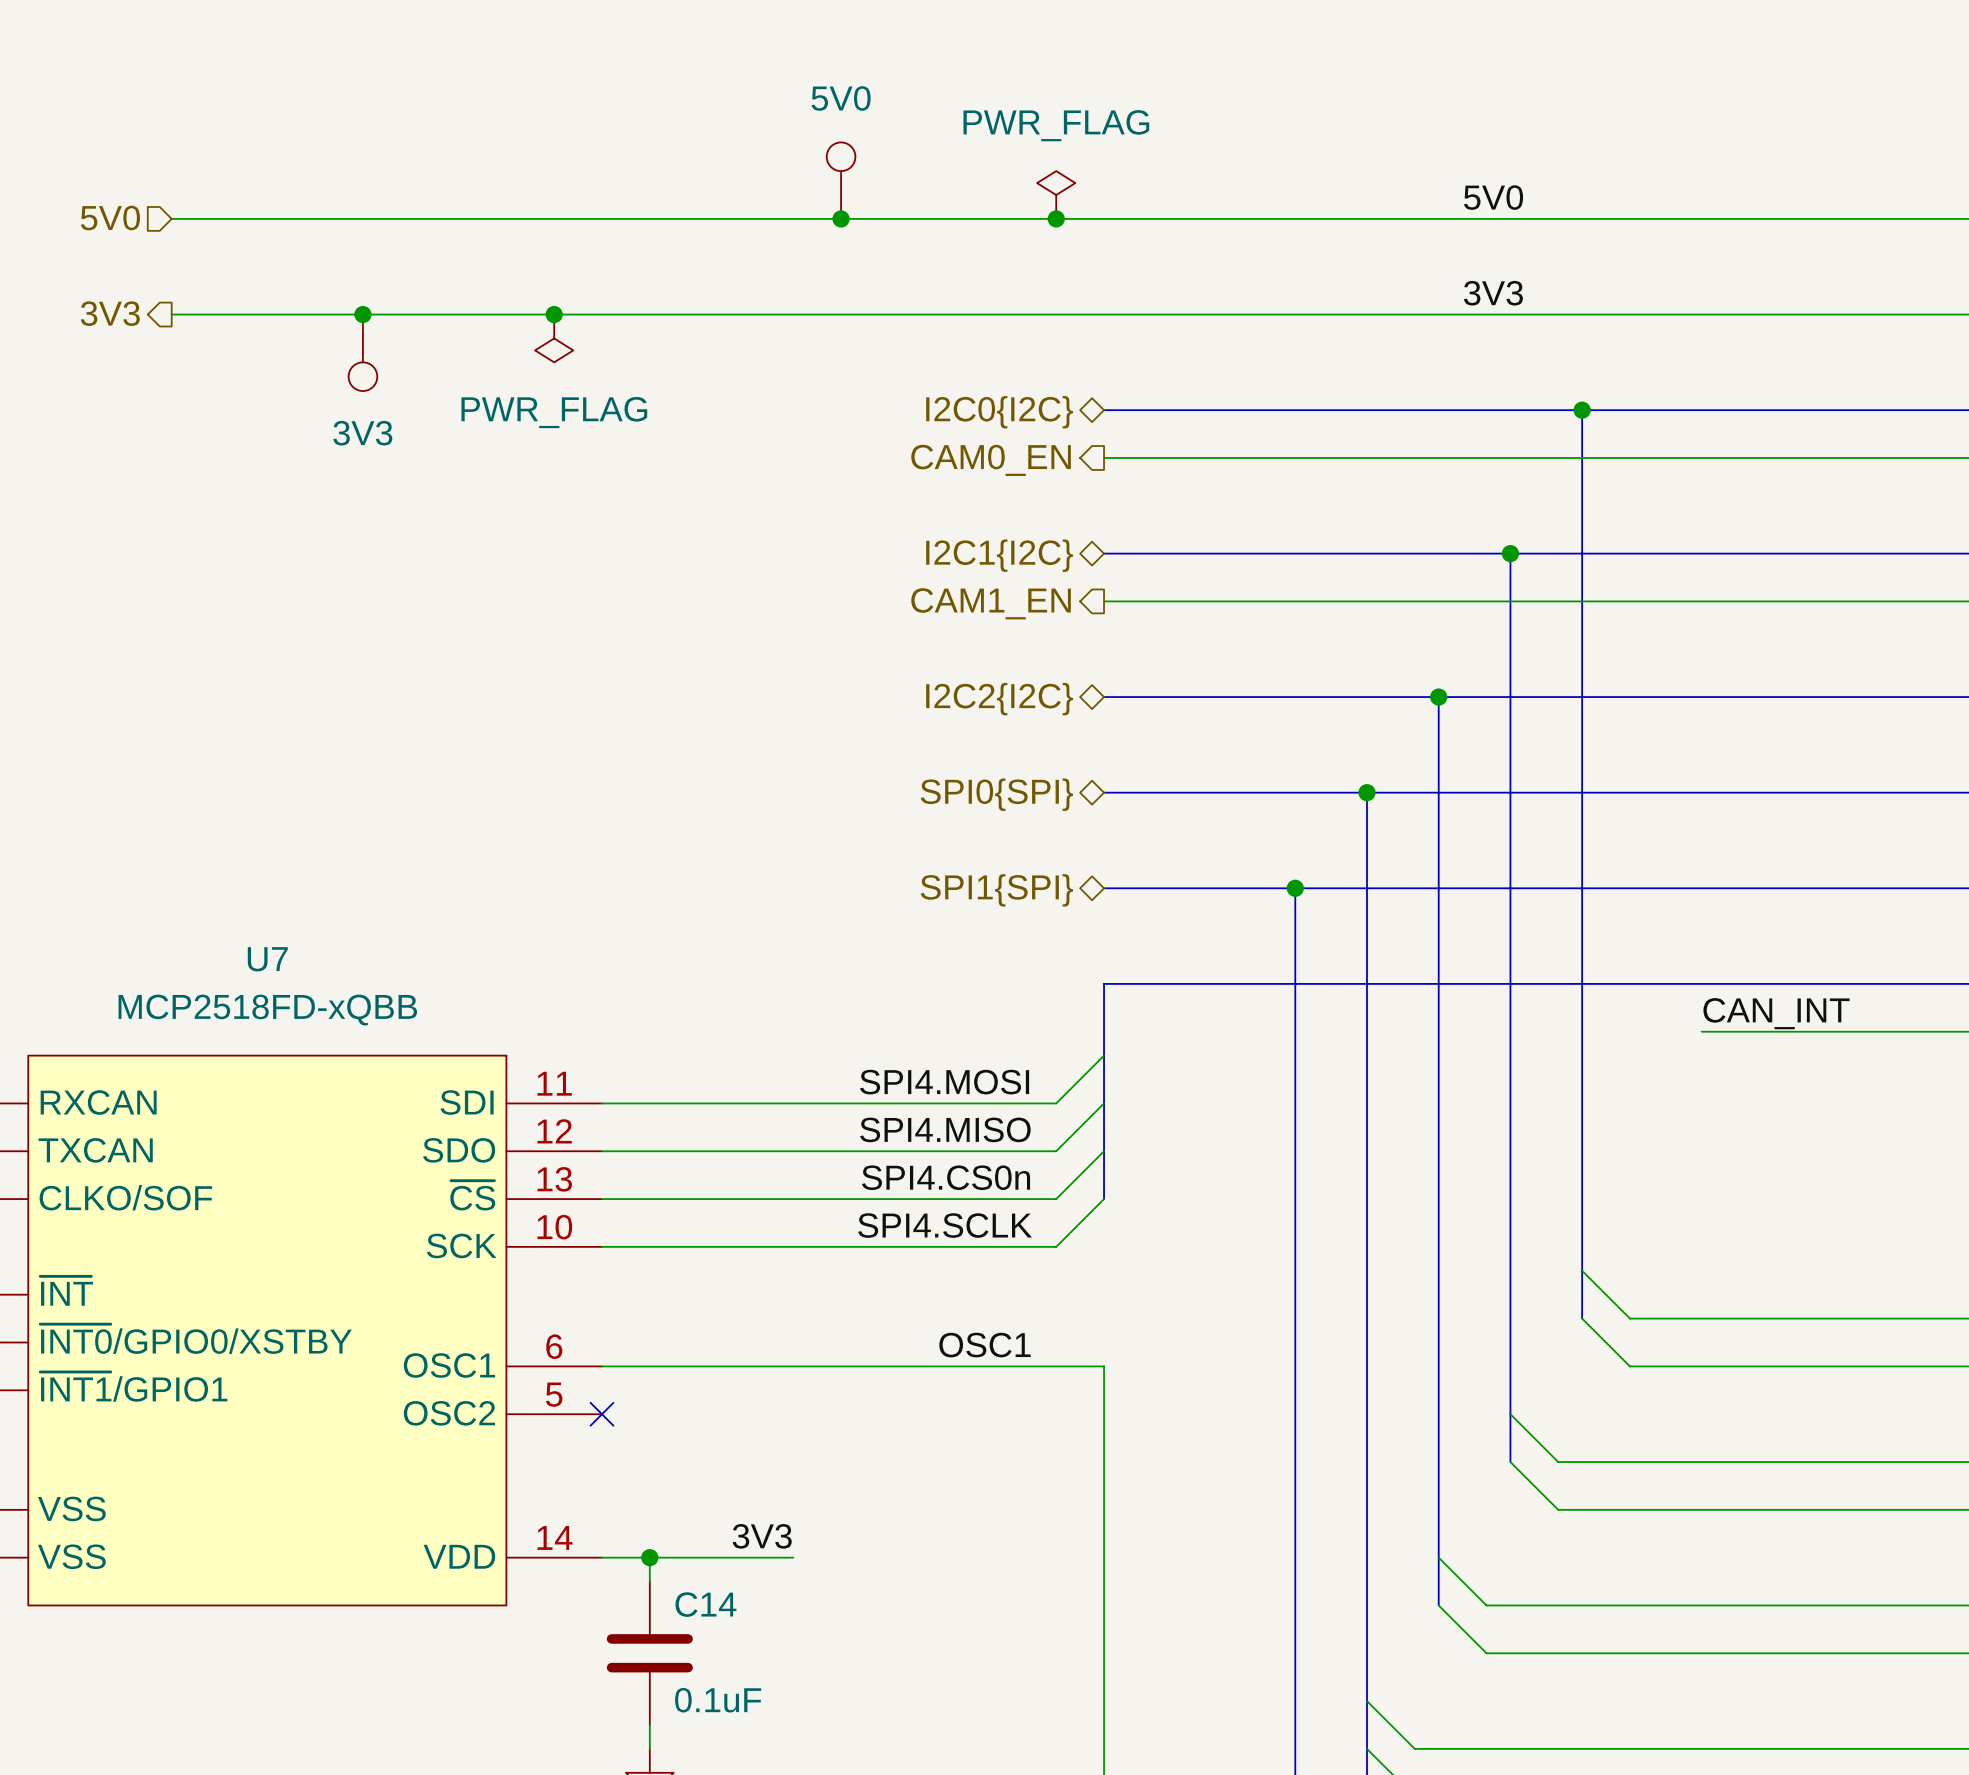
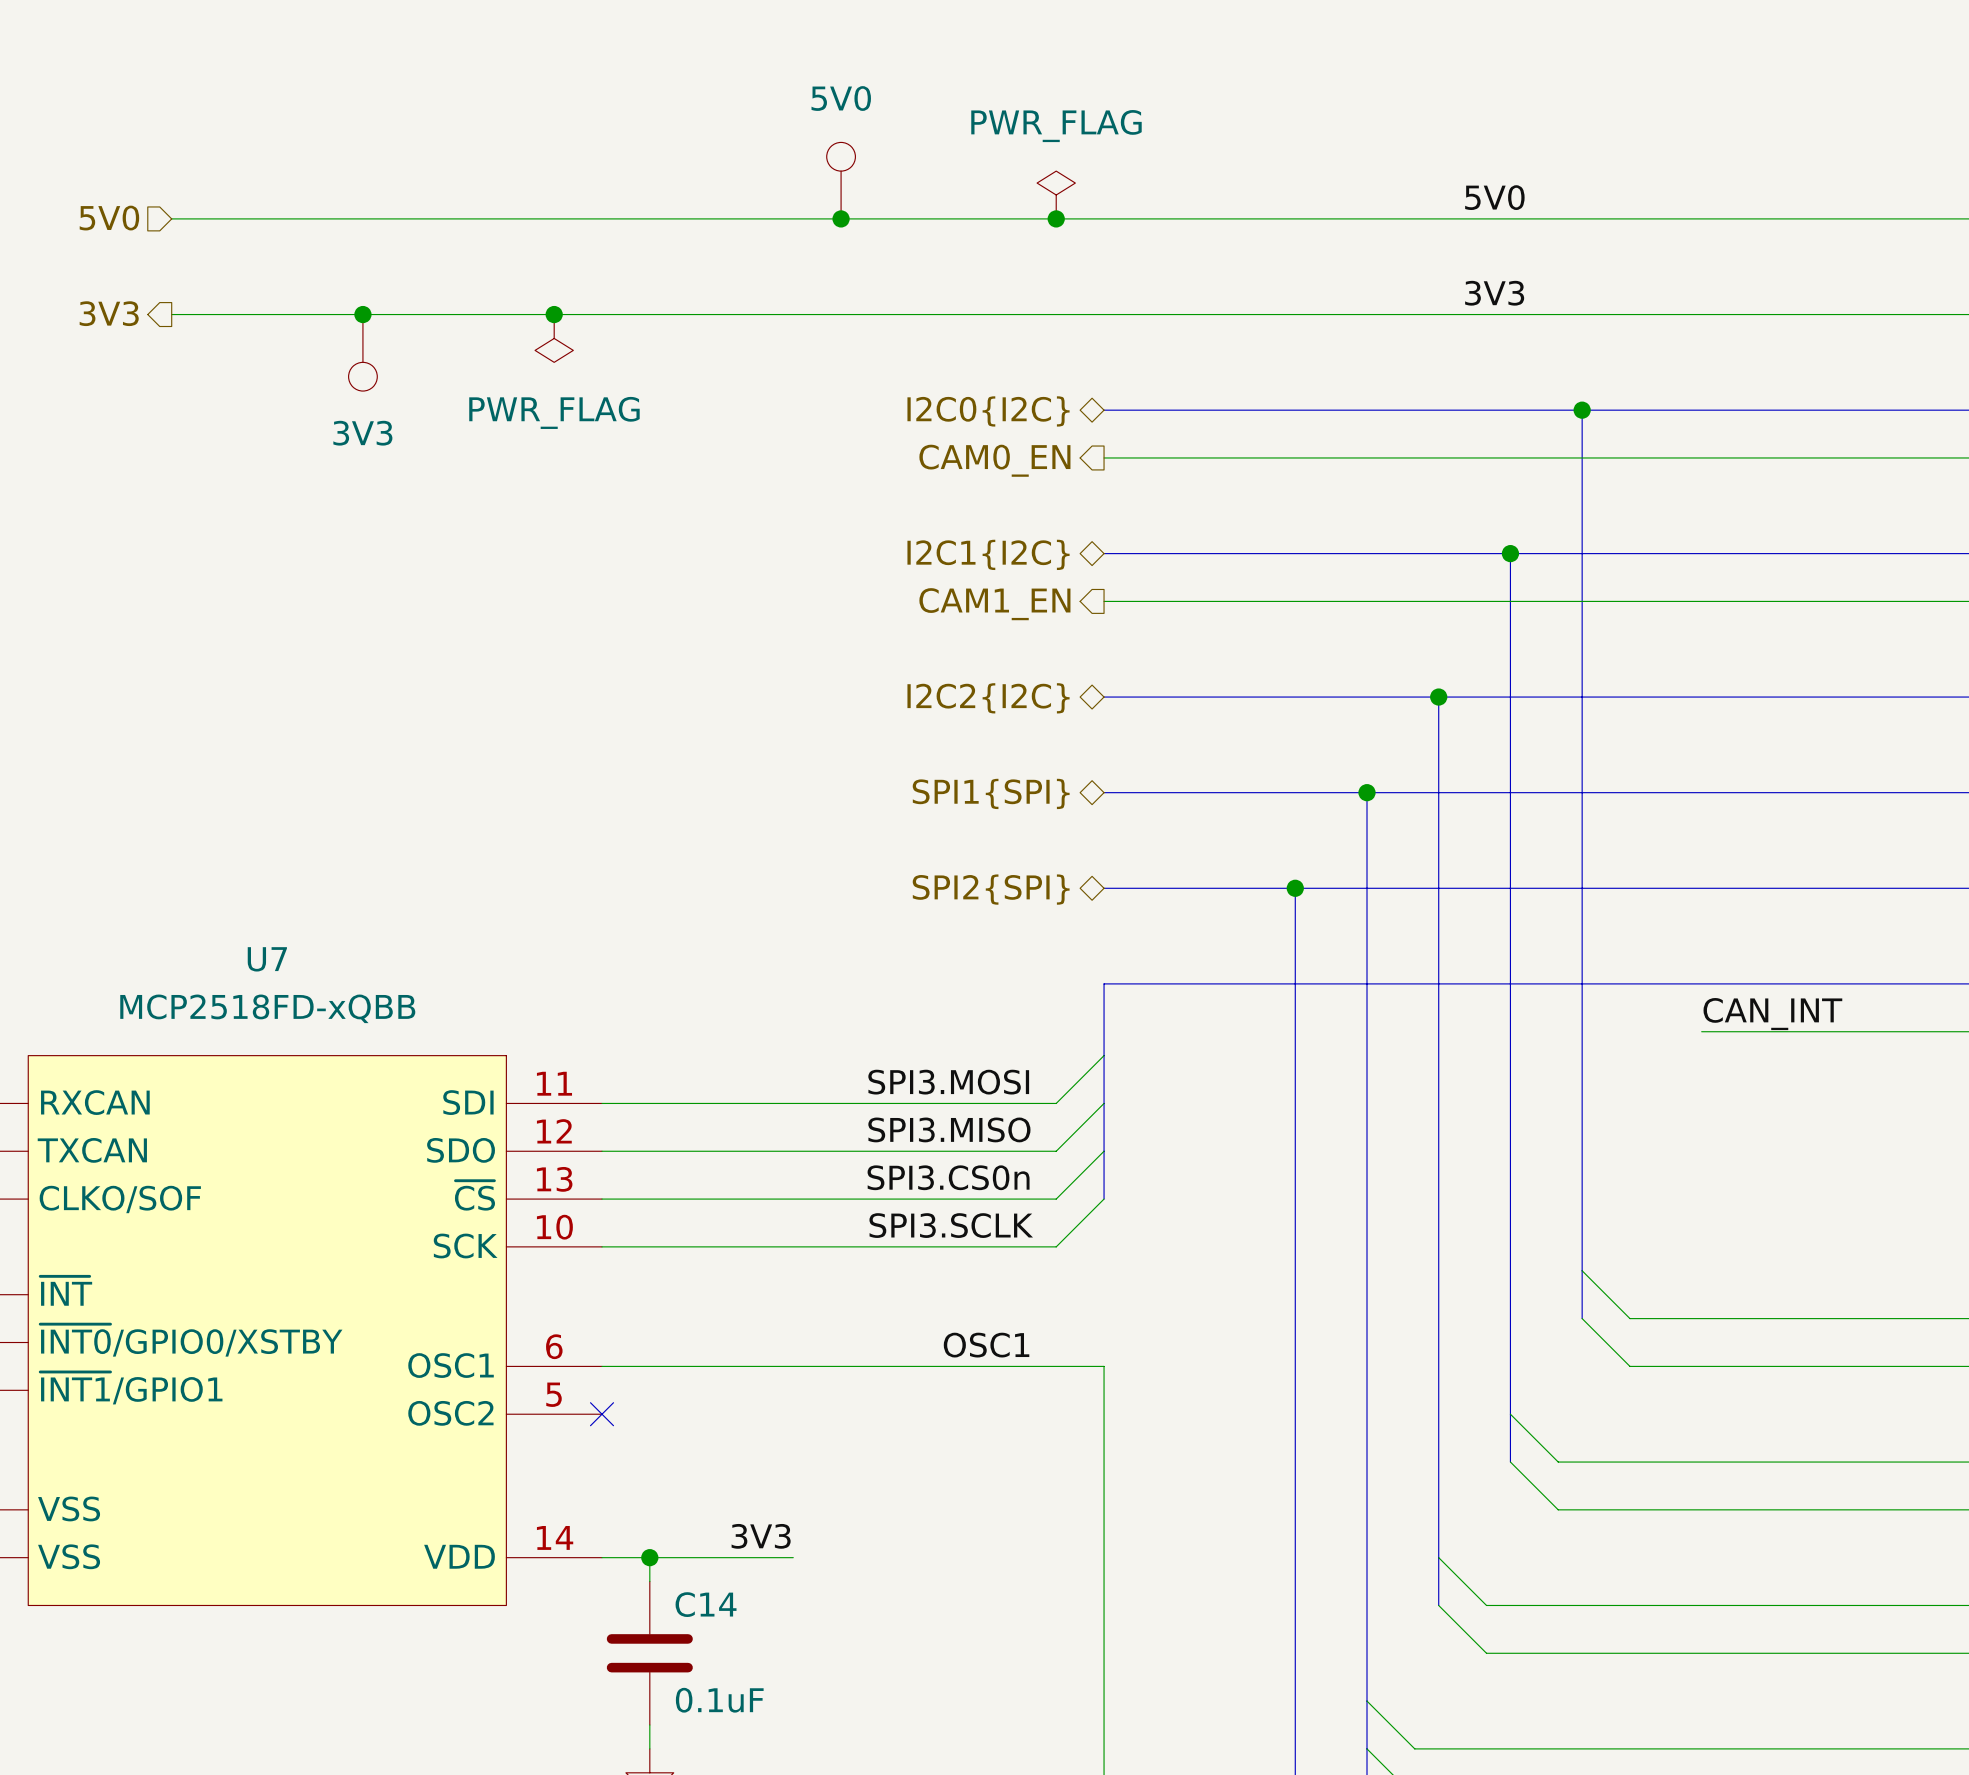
hierarchical label: SPI0{SPI} (996, 794) -> SPI1{SPI} (991, 793)
hierarchical label: SPI1{SPI} (996, 890) -> SPI2{SPI} (991, 889)
label: SPI4.MOSI (944, 1082) -> SPI3.MOSI (948, 1082)
label: SPI4.MISO (945, 1129) -> SPI3.MISO (949, 1129)
label: SPI4.CS0n (946, 1177) -> SPI3.CS0n (948, 1177)
label: SPI4.SCLK (945, 1225) -> SPI3.SCLK (951, 1225)

